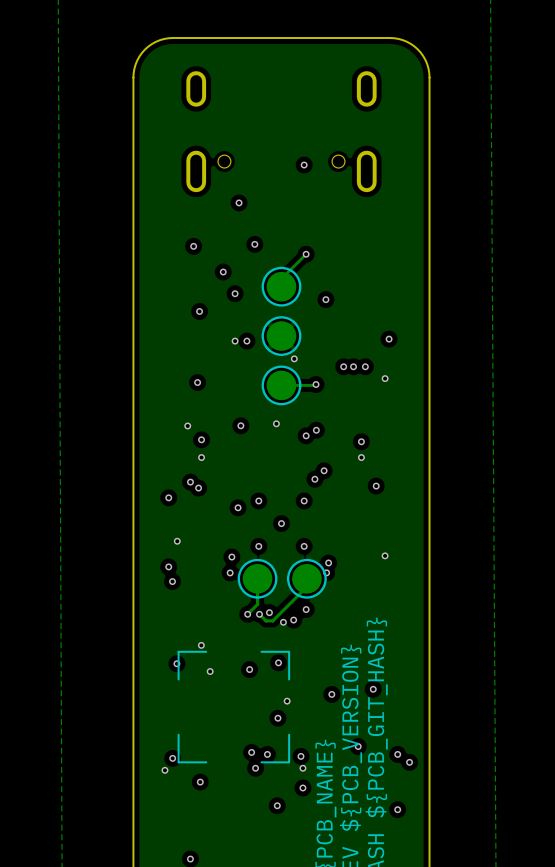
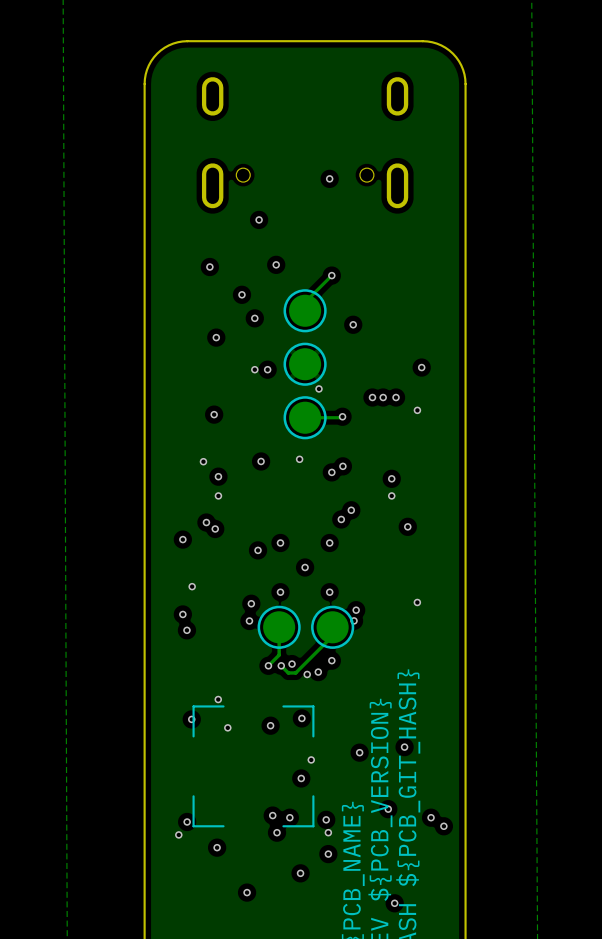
via position: (397, 809) -> (394, 903)
via position: (190, 859) -> (247, 892)

